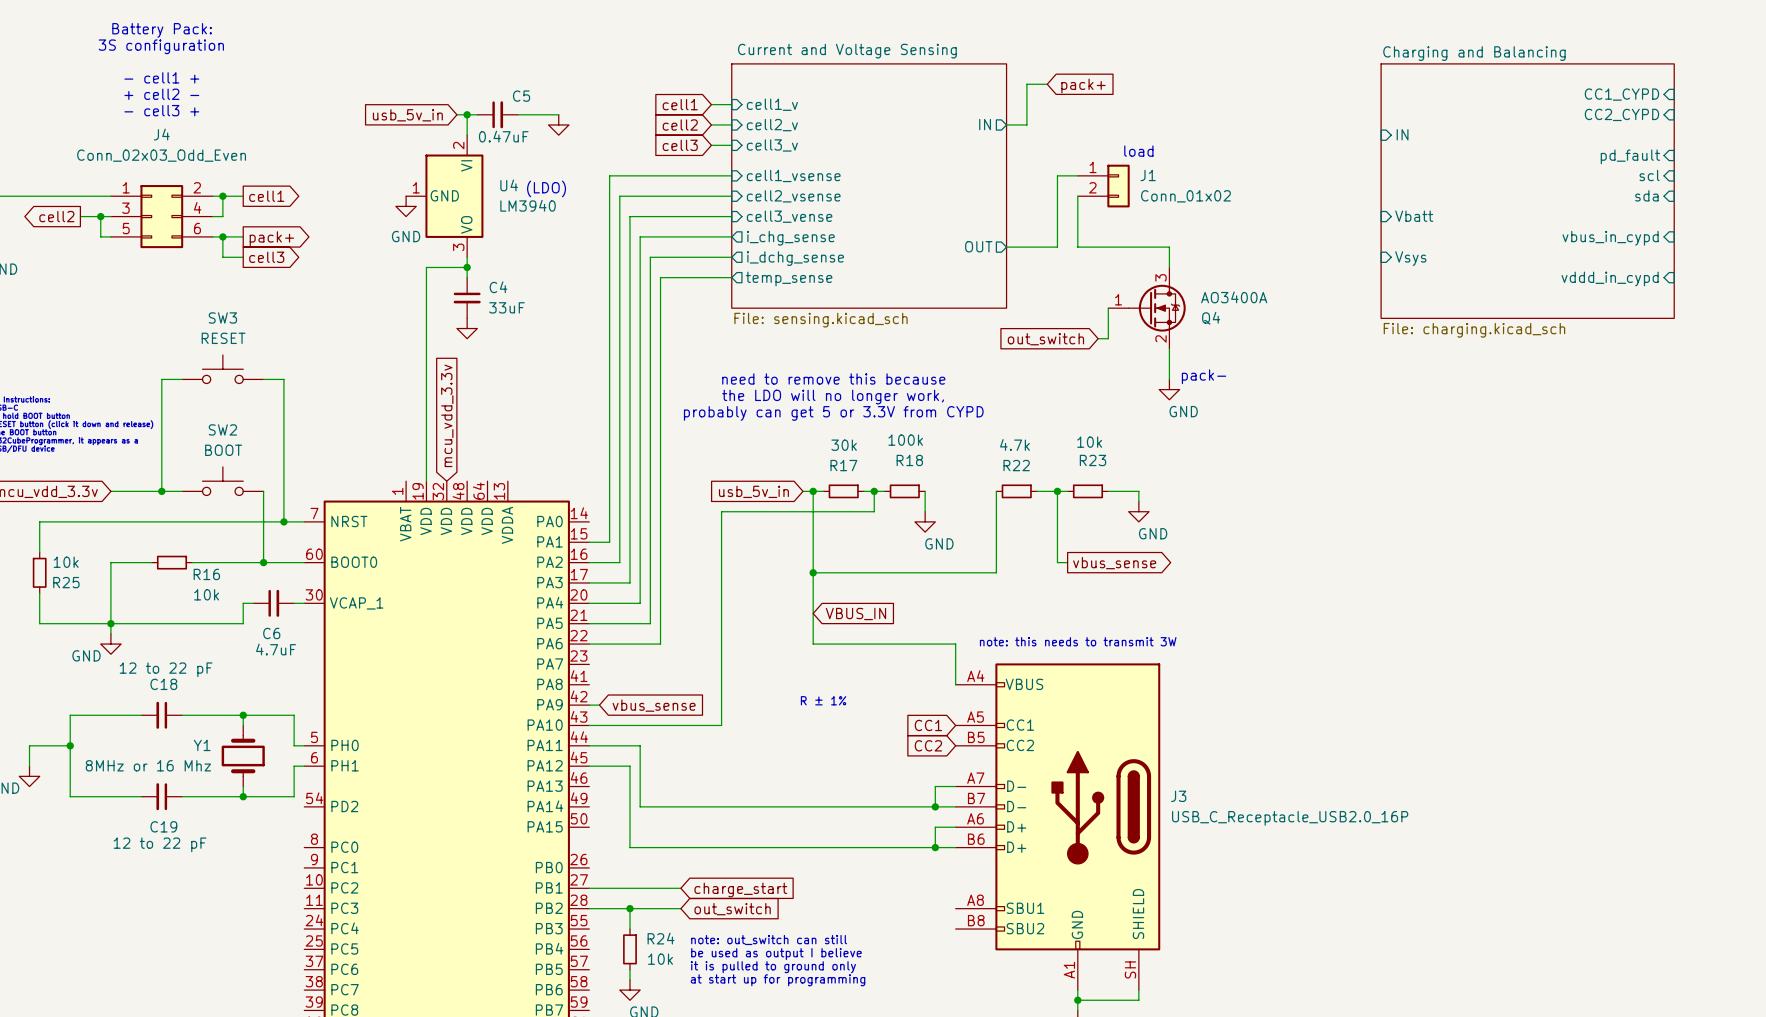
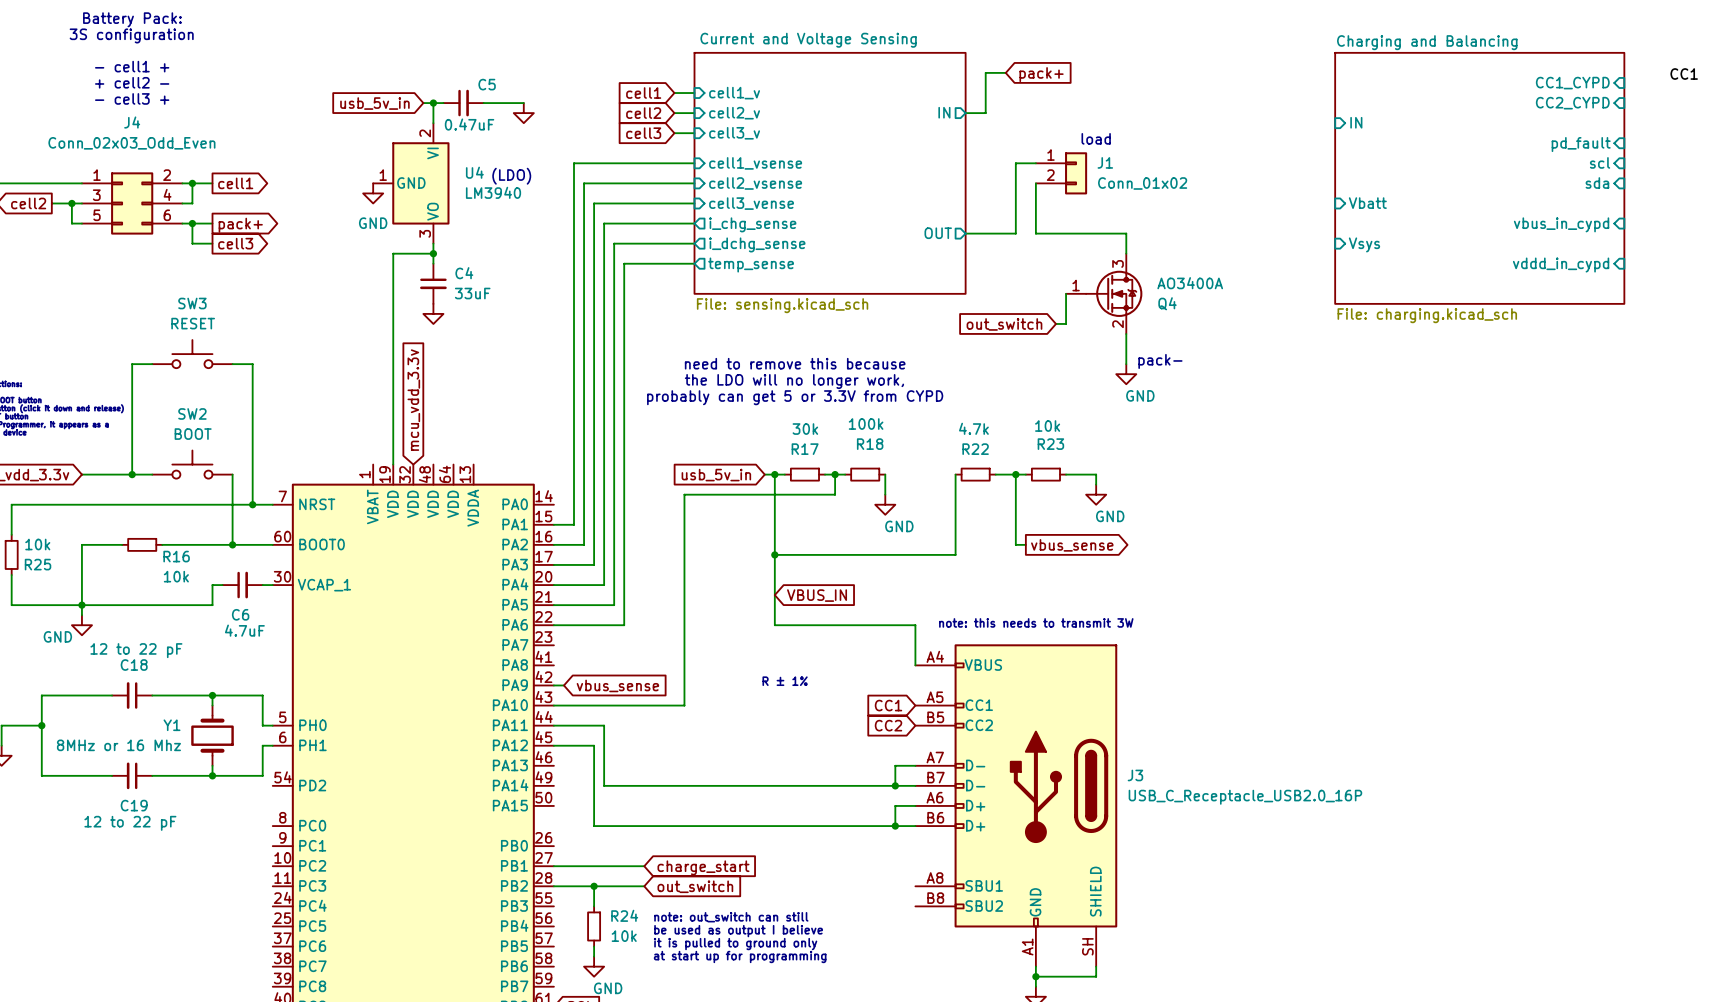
label: none -> CC1 (1684, 74)

